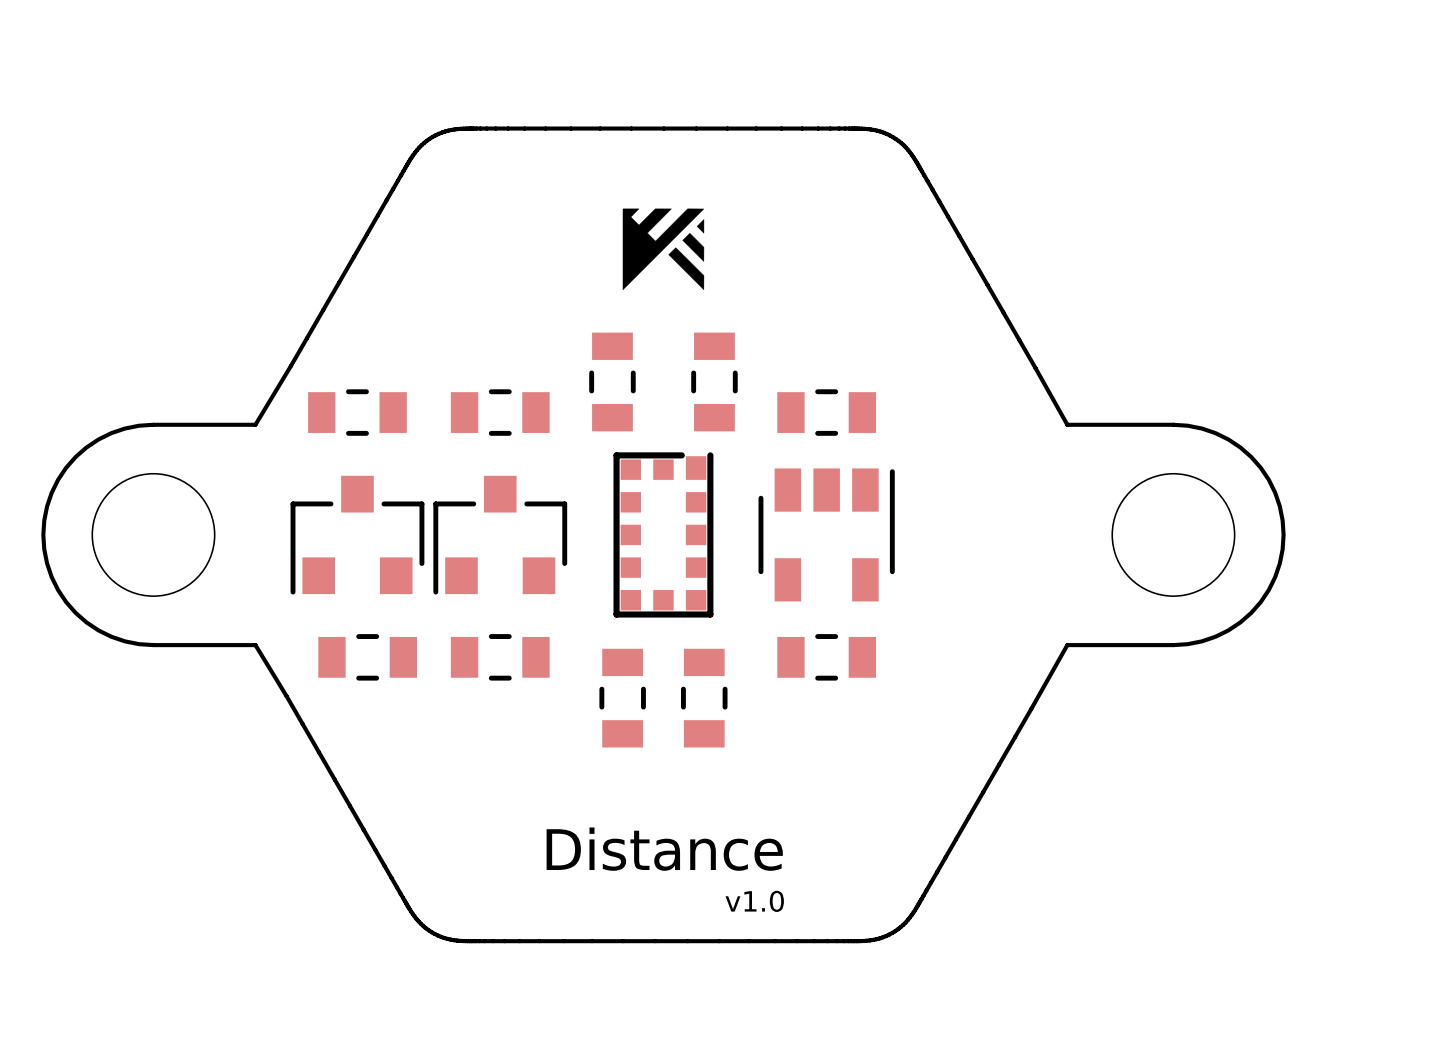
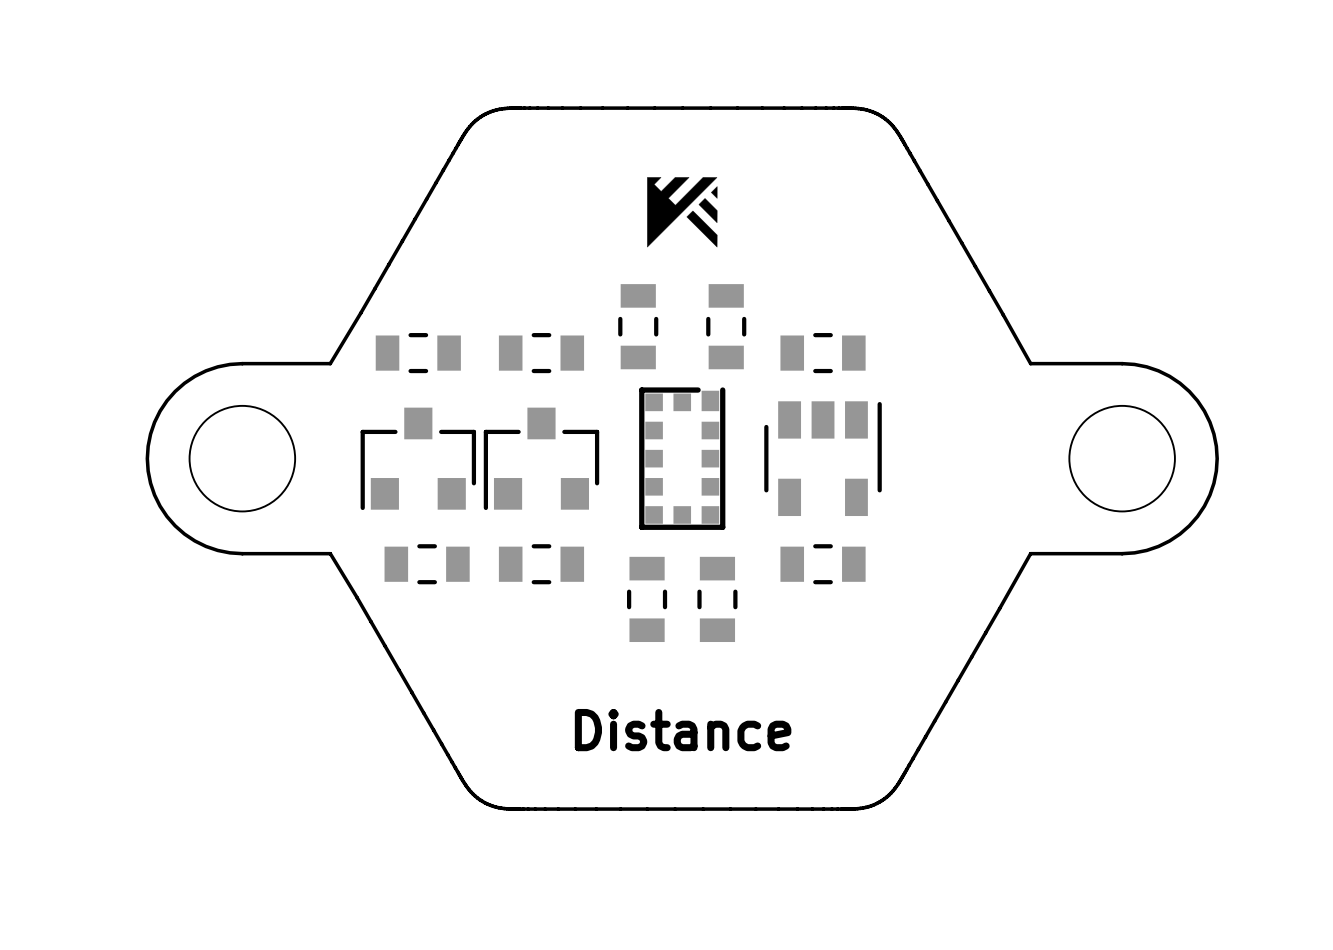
text: v1.0 (754, 901) -> none

